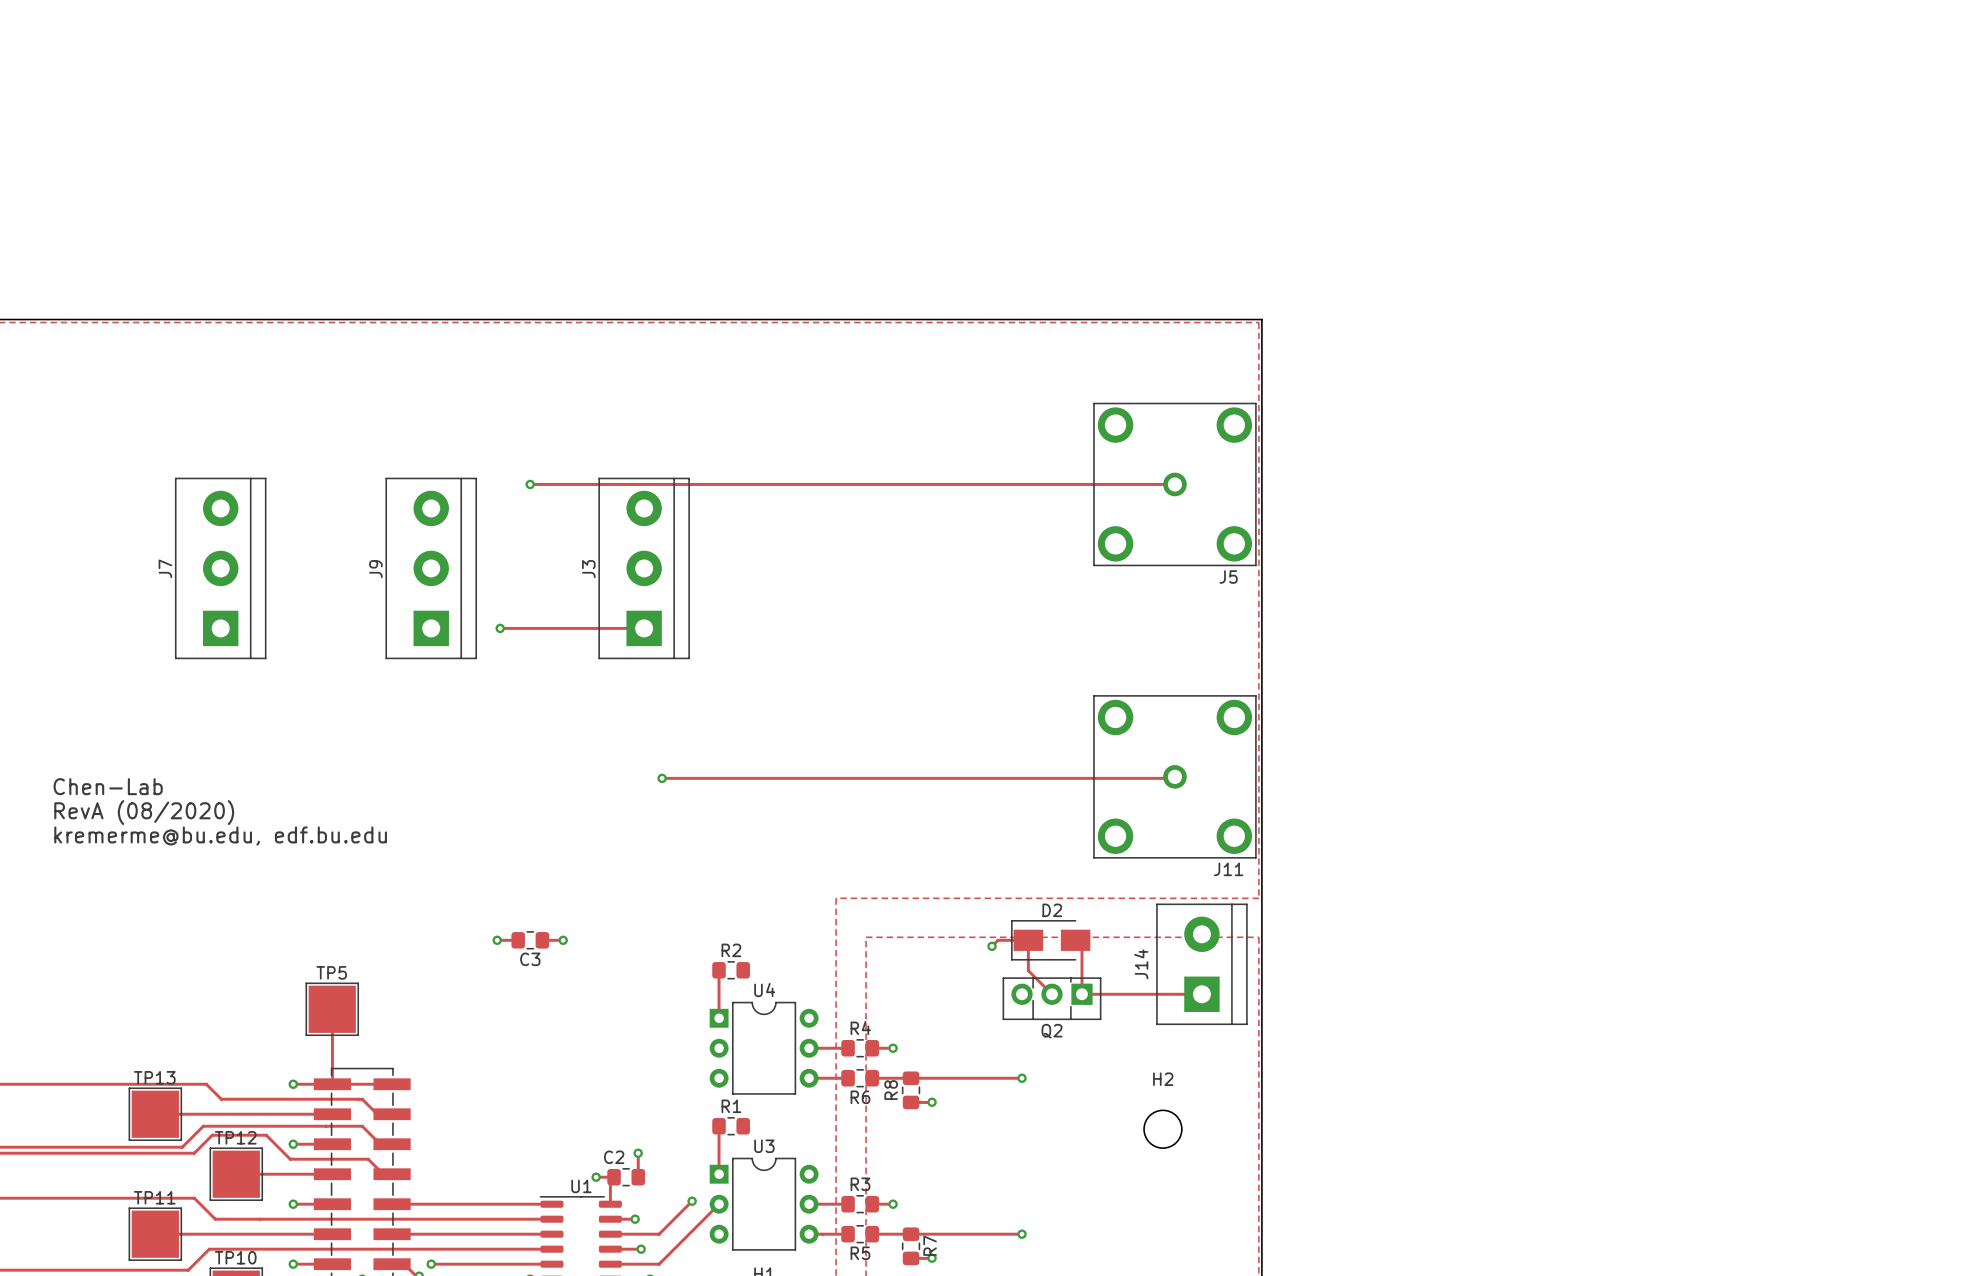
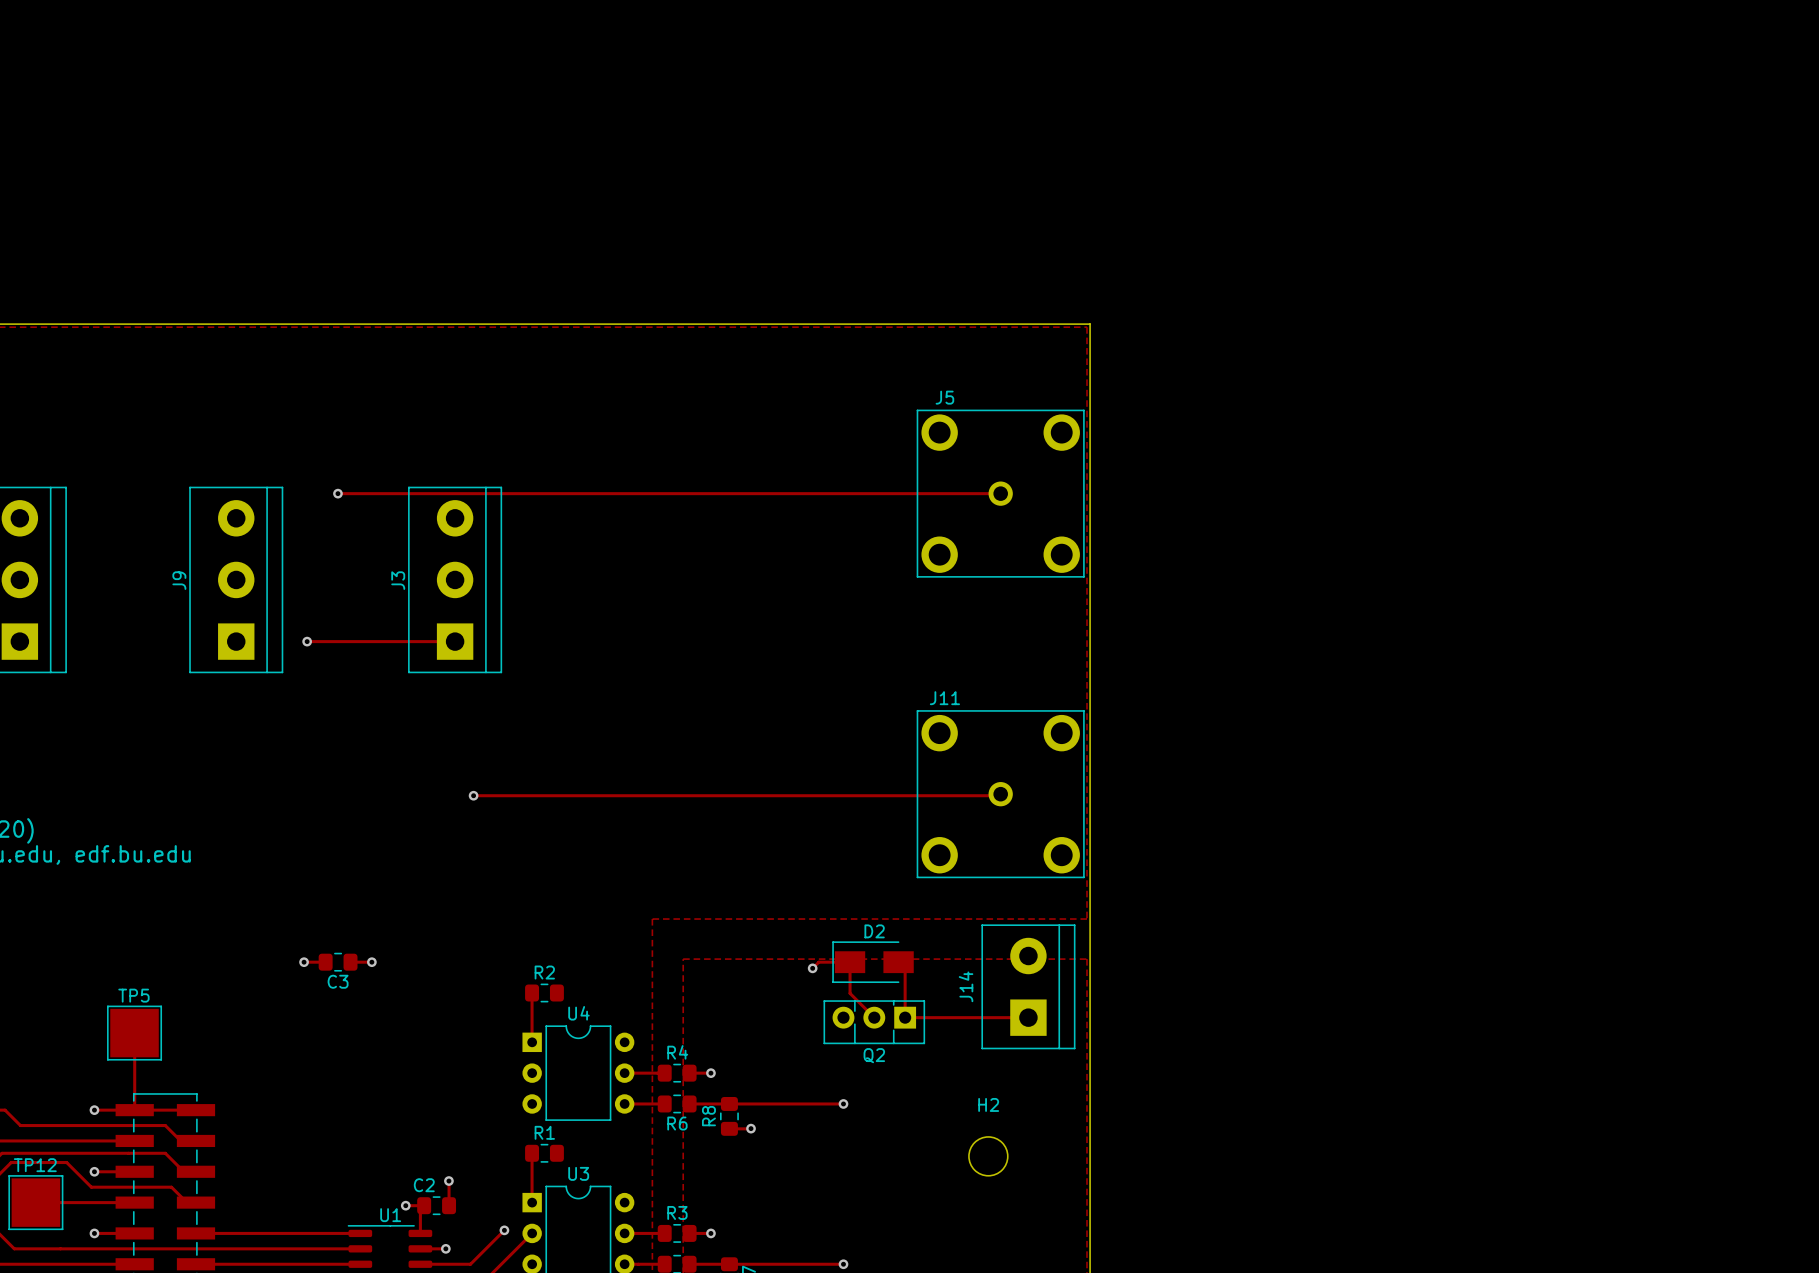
J5 name position: J5 (1228, 576) -> J5 (944, 397)
J11 name position: J11 (1228, 869) -> J11 (944, 698)

